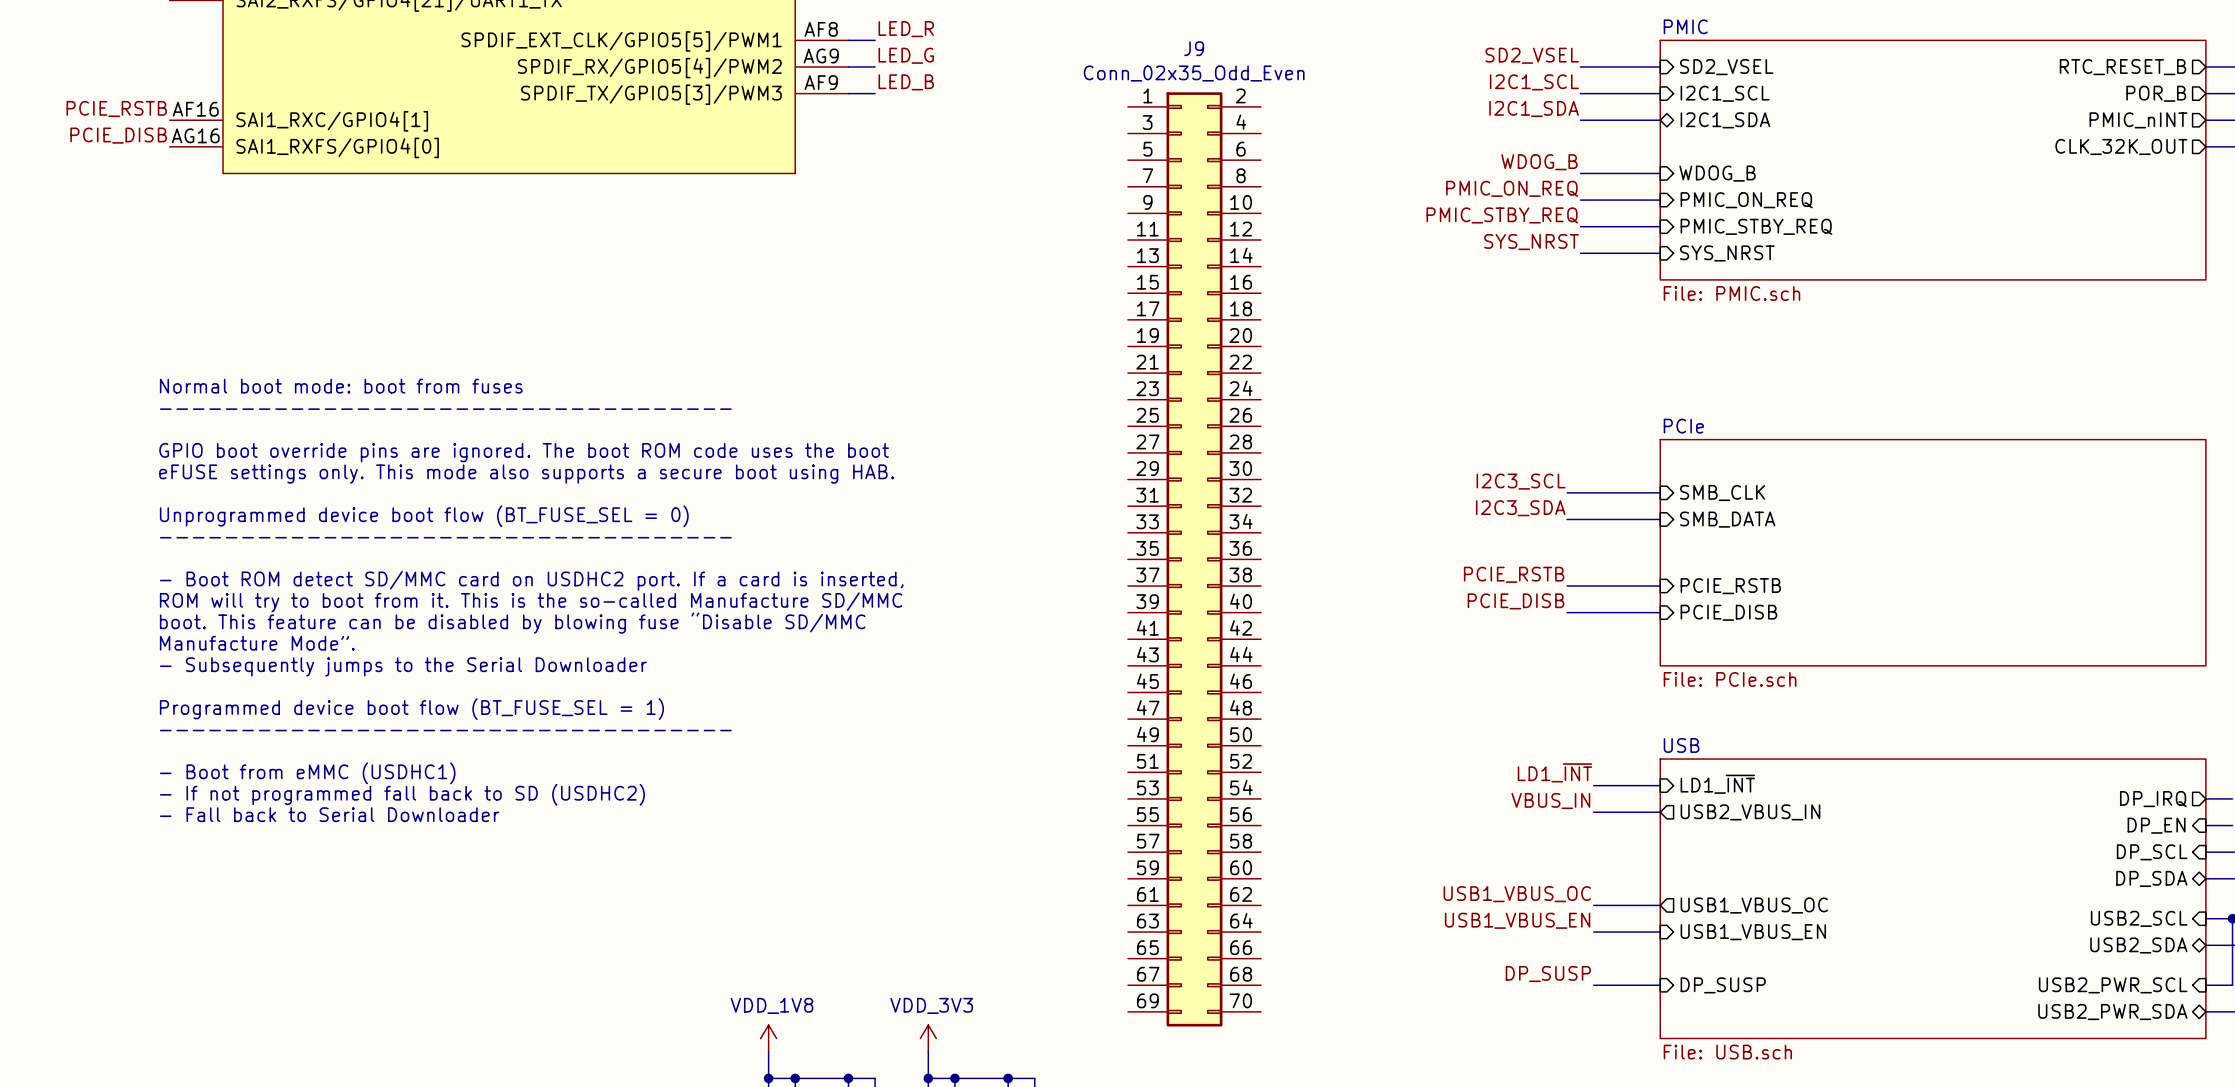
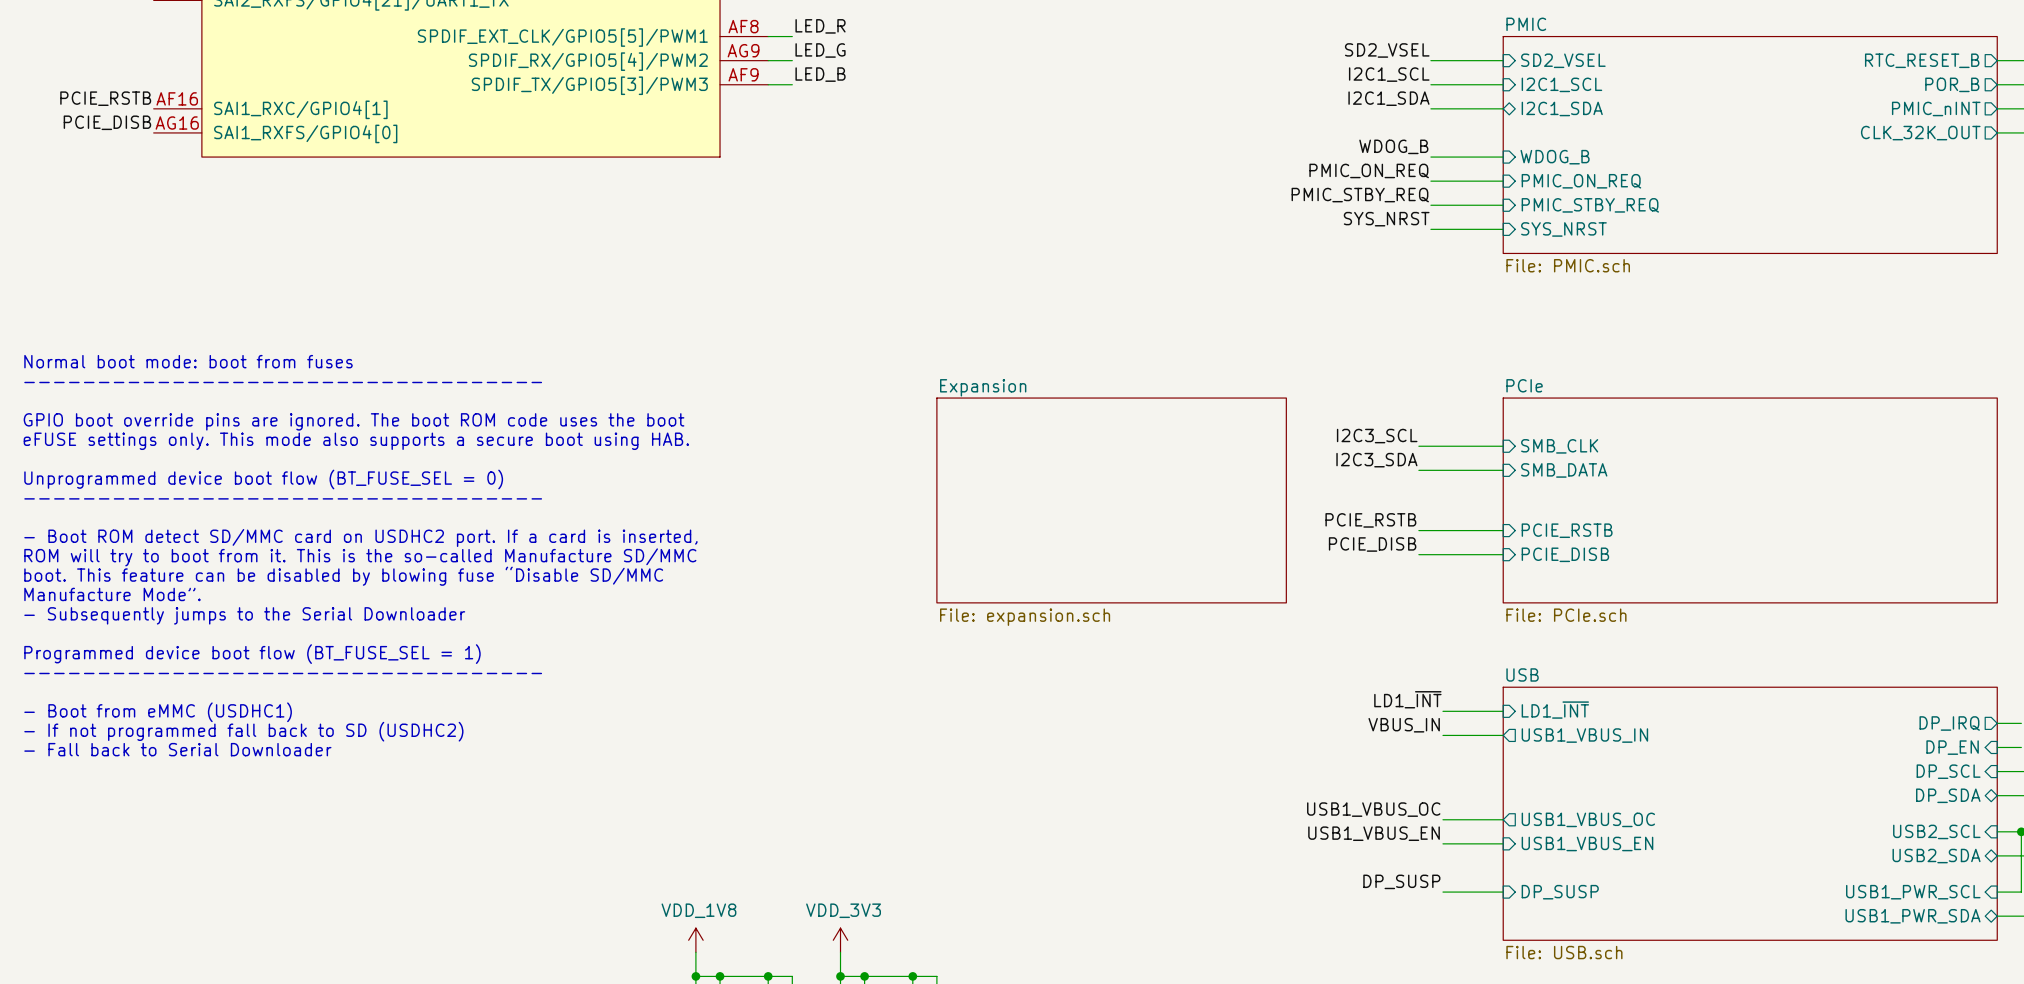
text position: Normal boot mode: boot from fuses (341, 386) -> Normal boot mode: boot from fuses (188, 361)
text position: ----------------------------------- (445, 409) -> ----------------------------------- (283, 382)
text position: GPIO boot override pins are ignored. The boot ROM code uses the boot (524, 452) -> GPIO boot override pins are ignored. The boot ROM code uses the boot (354, 421)
text position: eFUSE settings only. This mode also supports a secure boot using HAB. (526, 474) -> eFUSE settings only. This mode also supports a secure boot using HAB. (356, 441)
text position: Unprogrammed device boot flow (BT_FUSE_SEL = 0) (424, 516) -> Unprogrammed device boot flow (BT_FUSE_SEL = 0) (263, 479)
text position: ----------------------------------- (445, 537) -> ----------------------------------- (283, 498)
sheet Expansion: none -> File: expansion.sch (1111, 500)
J9: Conn_02x35_Odd_Even (1194, 559) -> none
text position: - Boot ROM detect SD/MMC card on USDHC2 port. If a card is inserted, (531, 580) -> - Boot ROM detect SD/MMC card on USDHC2 port. If a card is inserted, (360, 537)
text position: ROM will try to boot from it. This is the so-called Manufacture SD/MMC (531, 602) -> ROM will try to boot from it. This is the so-called Manufacture SD/MMC (360, 557)
text position: boot. This feature can be disabled by blowing fuse “Disable SD/MMC (512, 623) -> boot. This feature can be disabled by blowing fuse “Disable SD/MMC (343, 576)
text position: Manufacture Mode”. (257, 643) -> Manufacture Mode”. (112, 594)
text position: - Subsequently jumps to the Serial Downloader (403, 666) -> - Subsequently jumps to the Serial Downloader (244, 615)
text position: Programmed device boot flow (BT_FUSE_SEL = 1) (411, 709) -> Programmed device boot flow (BT_FUSE_SEL = 1) (252, 654)
text position: ----------------------------------- (445, 730) -> ----------------------------------- (283, 673)
text position: - Boot from eMMC (USDHC1) (307, 773) -> - Boot from eMMC (USDHC1) (158, 712)
text position: - If not programmed fall back to SD (USDHC2) (402, 794) -> - If not programmed fall back to SD (USDHC2) (243, 731)
sheet pin: USB2_VBUS_IN (1750, 812) -> USB1_VBUS_IN (1584, 735)
text position: - Fall back to Serial Downloader (329, 814) -> - Fall back to Serial Downloader (177, 749)
sheet pin: USB2_PWR_SCL (2113, 985) -> USB1_PWR_SCL (1913, 892)
sheet pin: USB2_PWR_SDA (2112, 1012) -> USB1_PWR_SDA (1913, 916)

